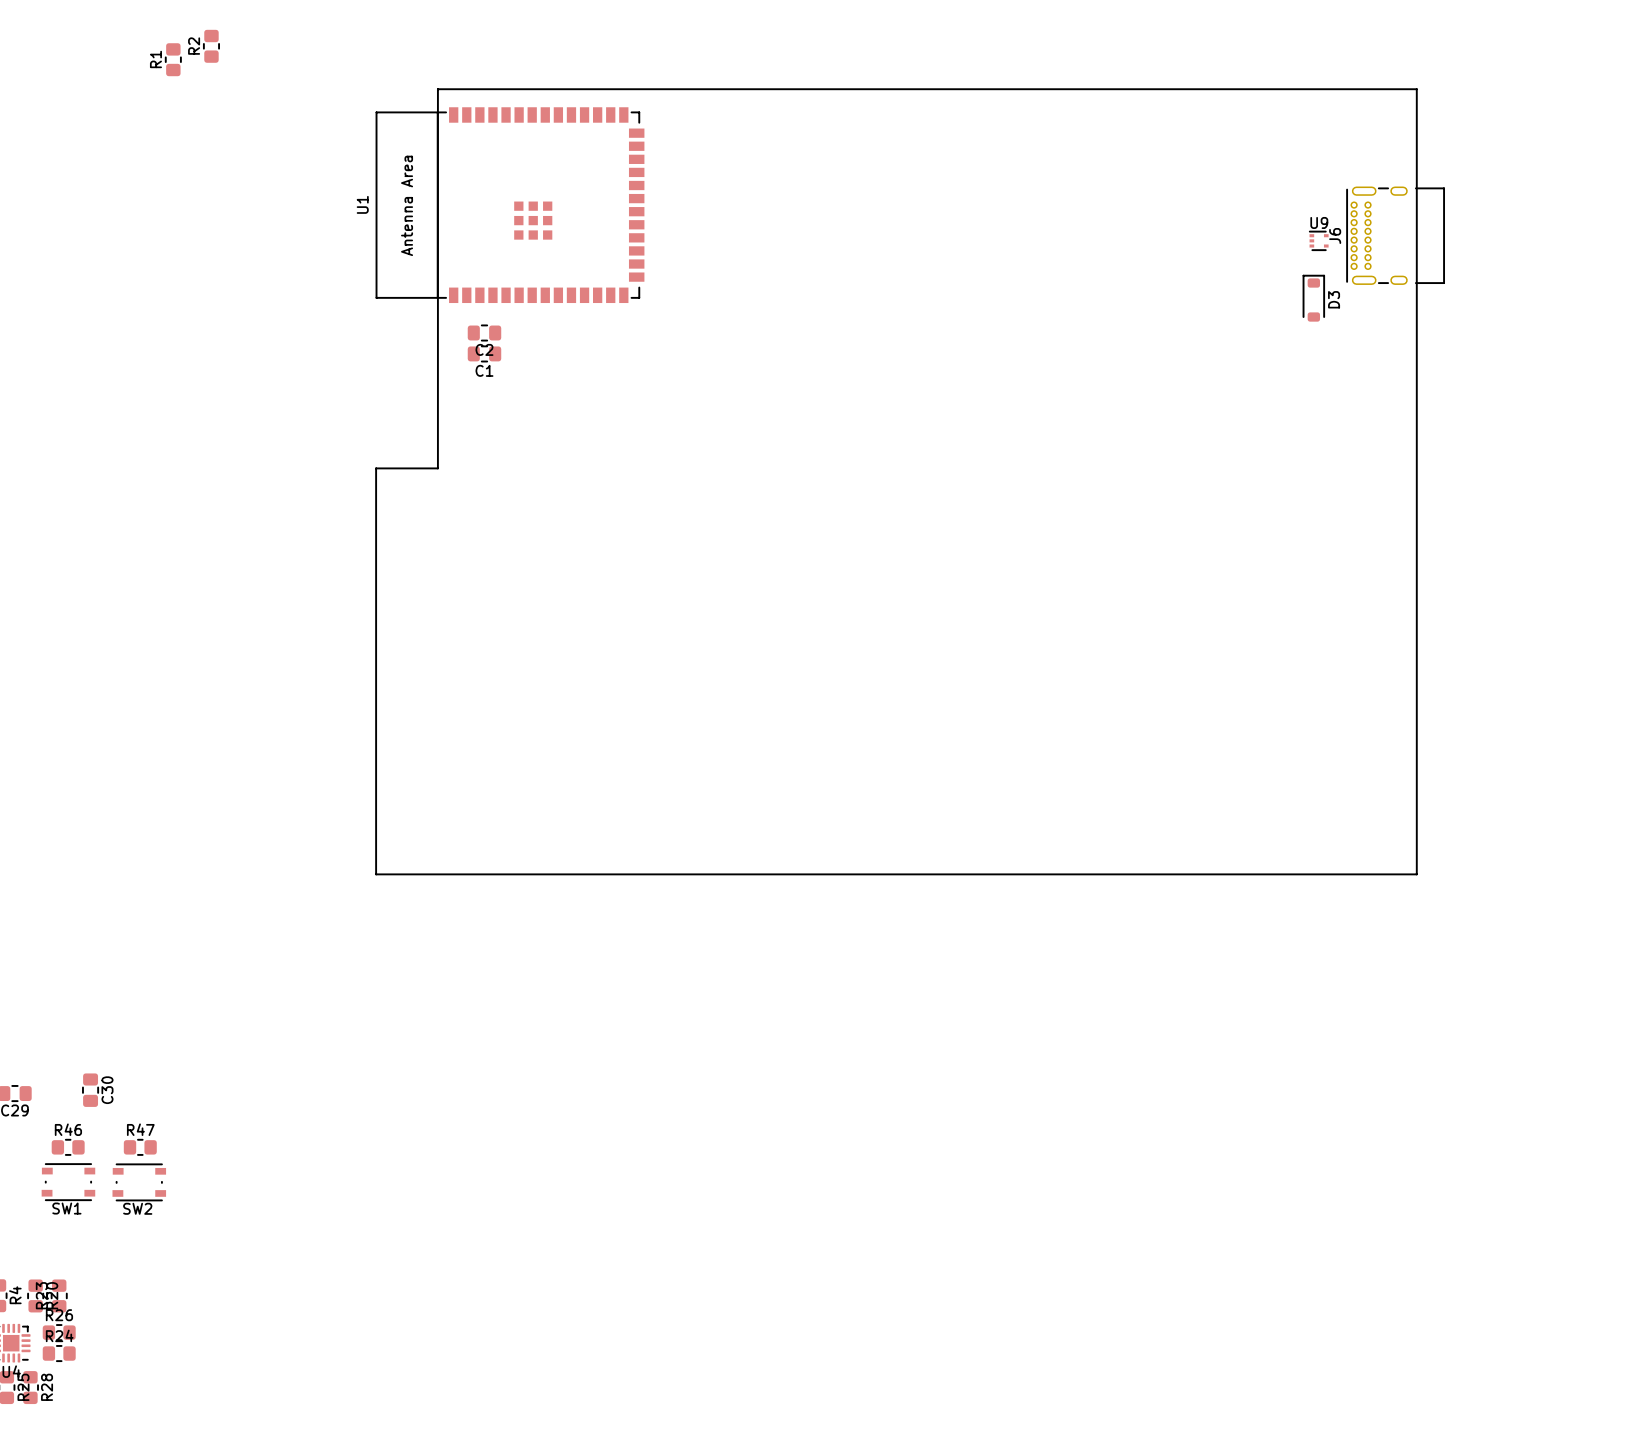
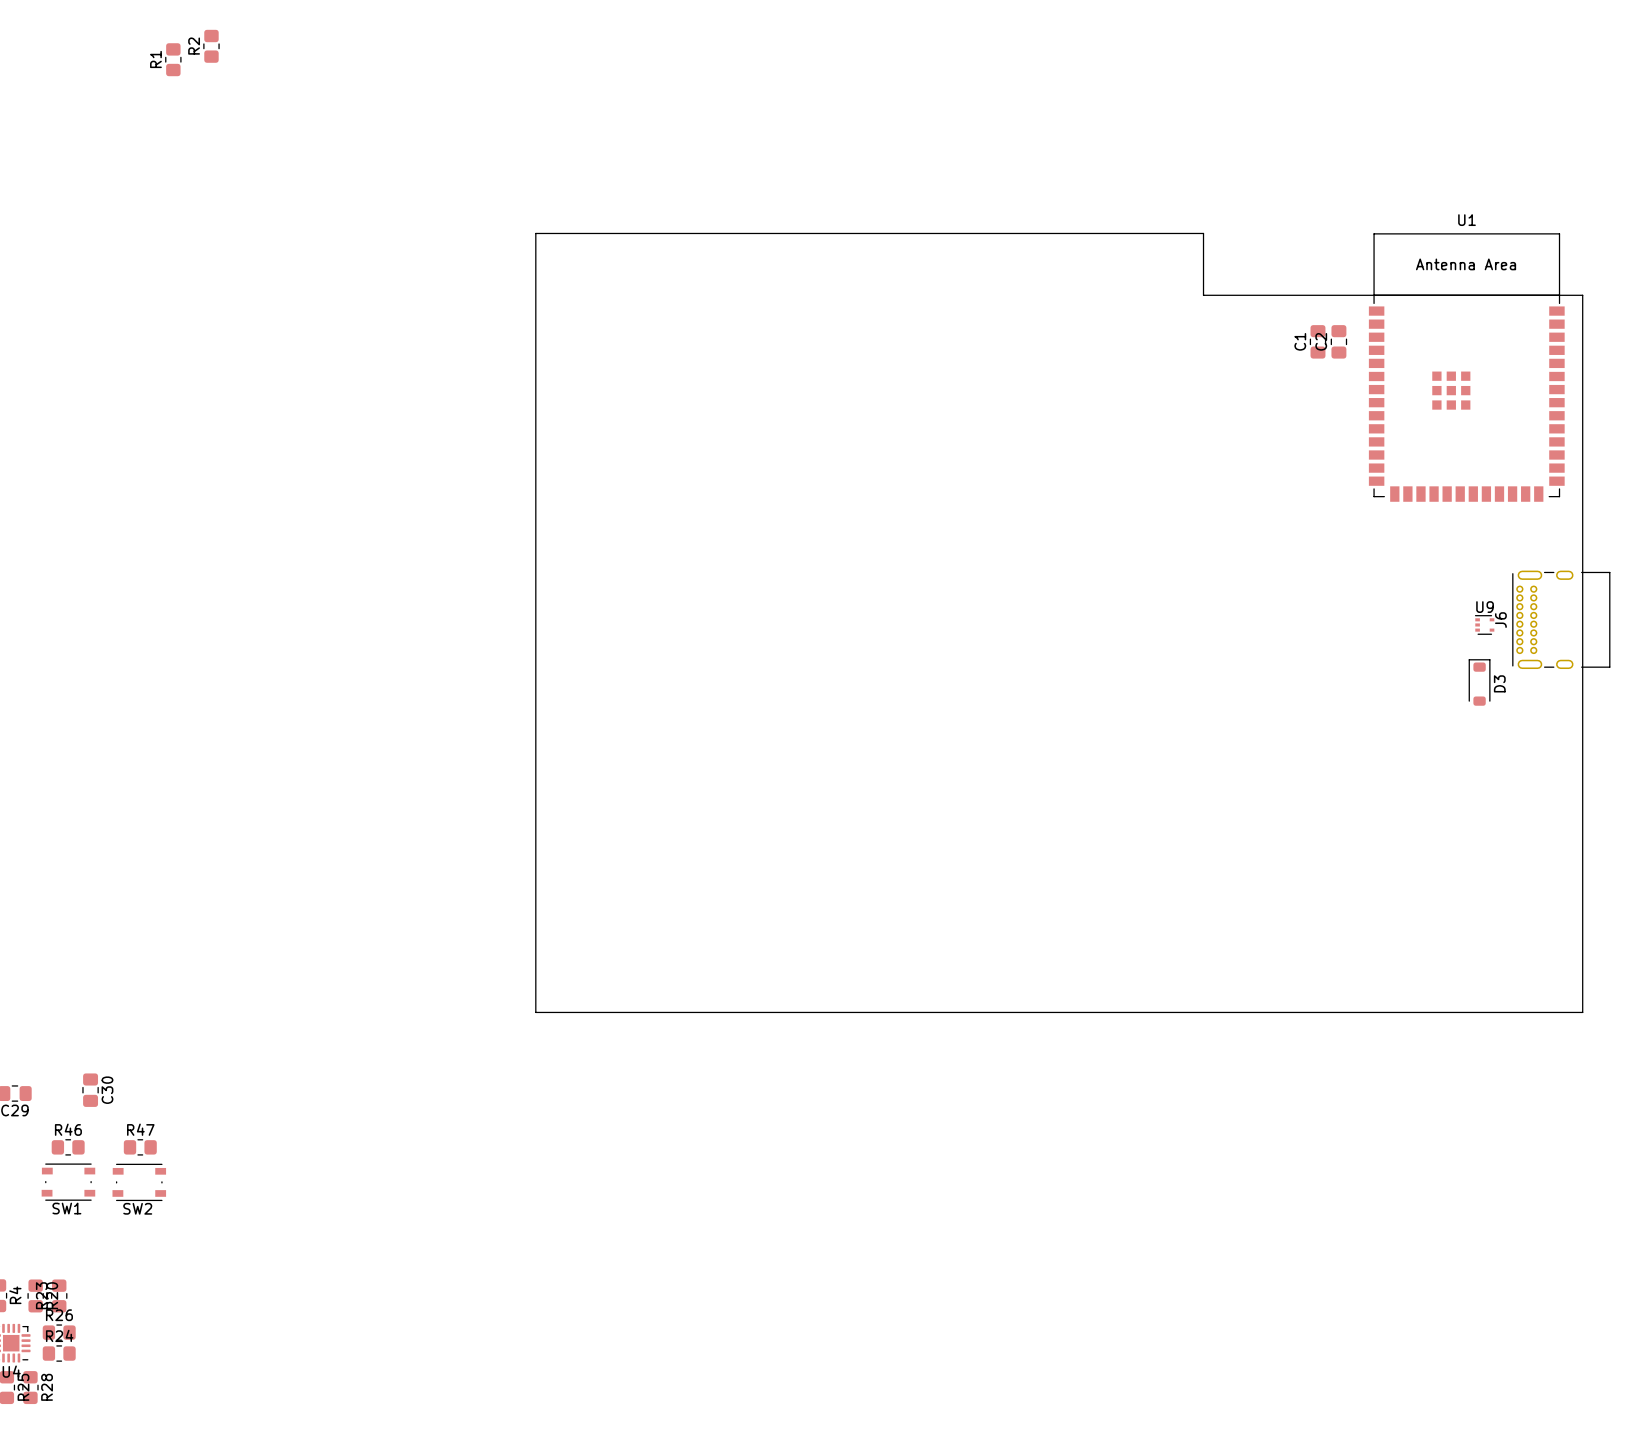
board edge: (437, 89) (437, 468) (376, 468) (376, 874) (1416, 874) (1416, 89) (437, 89) -> (535, 233) (535, 1012) (1582, 1012) (1582, 295) (1203, 295) (1203, 233) (535, 233)
U1 rotation: 0° (510, 205) -> 90° clockwise (1466, 367)
U1 position: (510, 205) -> (1466, 367)
J6 position: (1395, 235) -> (1561, 619)
U9 position: (1318, 240) -> (1484, 624)
D3 position: (1313, 298) -> (1479, 682)
C2 rotation: 0° (484, 332) -> 90° clockwise (1338, 341)
C2 position: (484, 332) -> (1338, 341)
C1 rotation: 0° (484, 353) -> 90° clockwise (1317, 341)
C1 position: (484, 353) -> (1317, 341)

